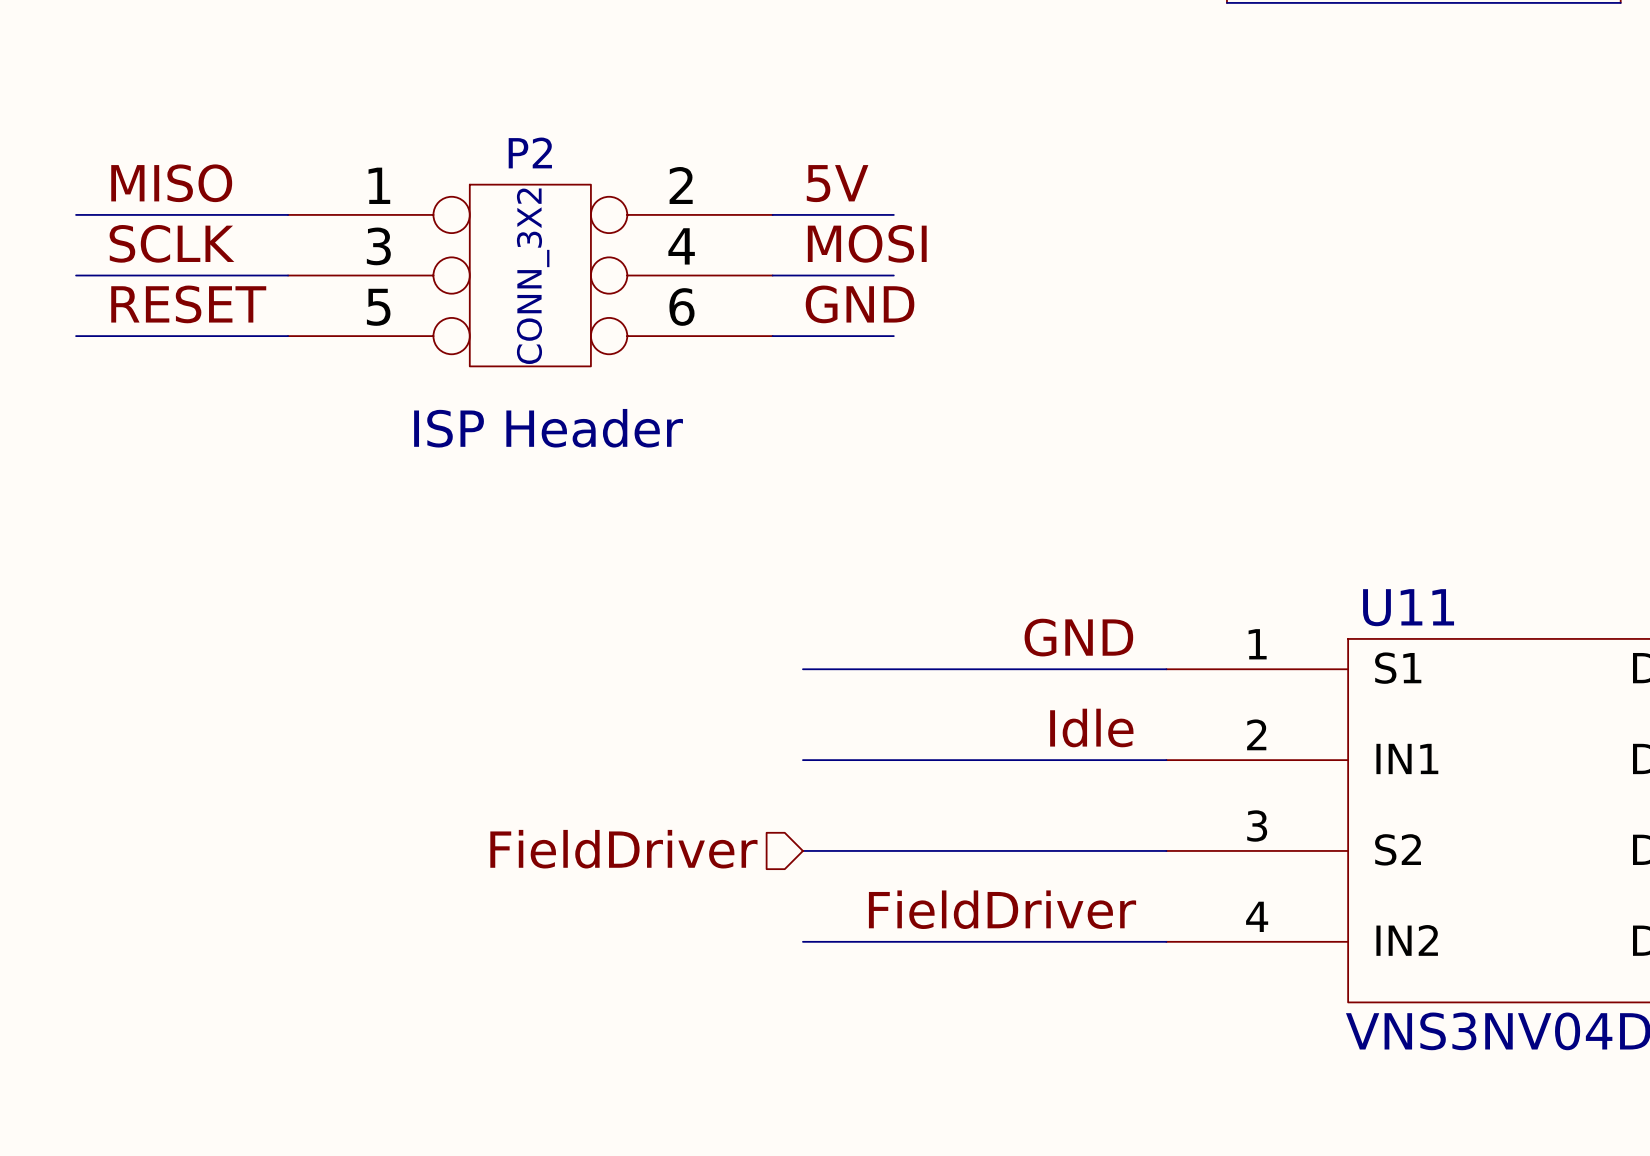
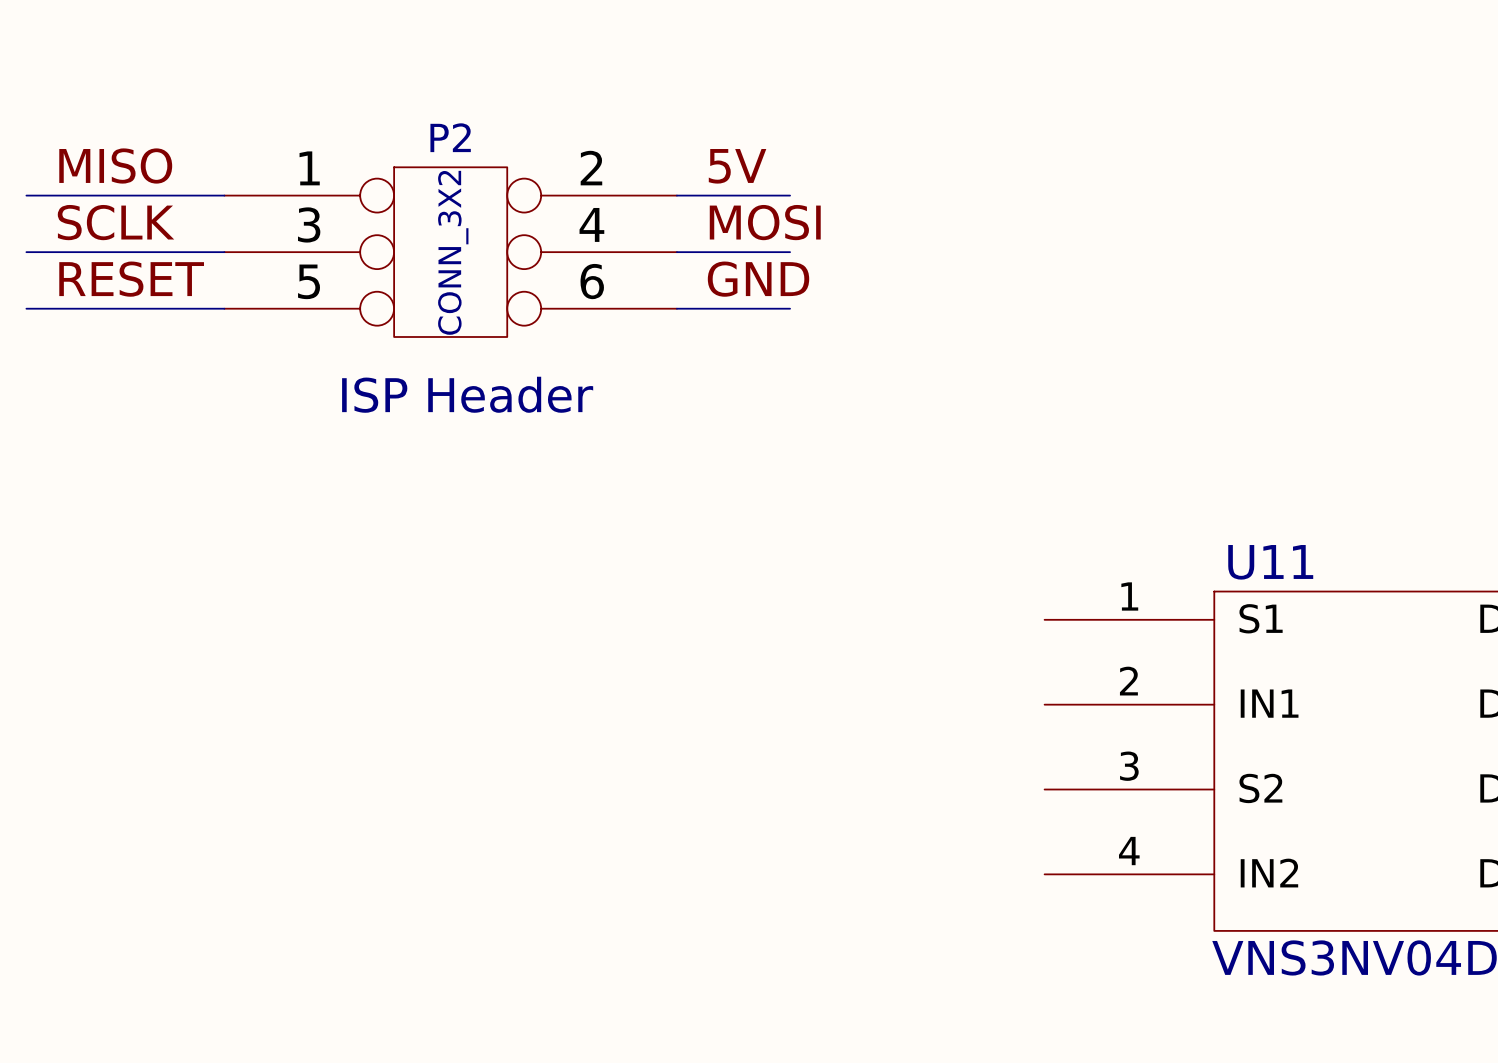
label: GND (1078, 637) -> none
wire: (802, 669) (1166, 669) -> none
label: Idle (1091, 727) -> none
wire: (802, 760) (1166, 760) -> none
hierarchical label: FieldDriver (623, 849) -> none
wire: (802, 850) (1166, 850) -> none
label: FieldDriver (1002, 909) -> none
wire: (802, 941) (1166, 941) -> none

